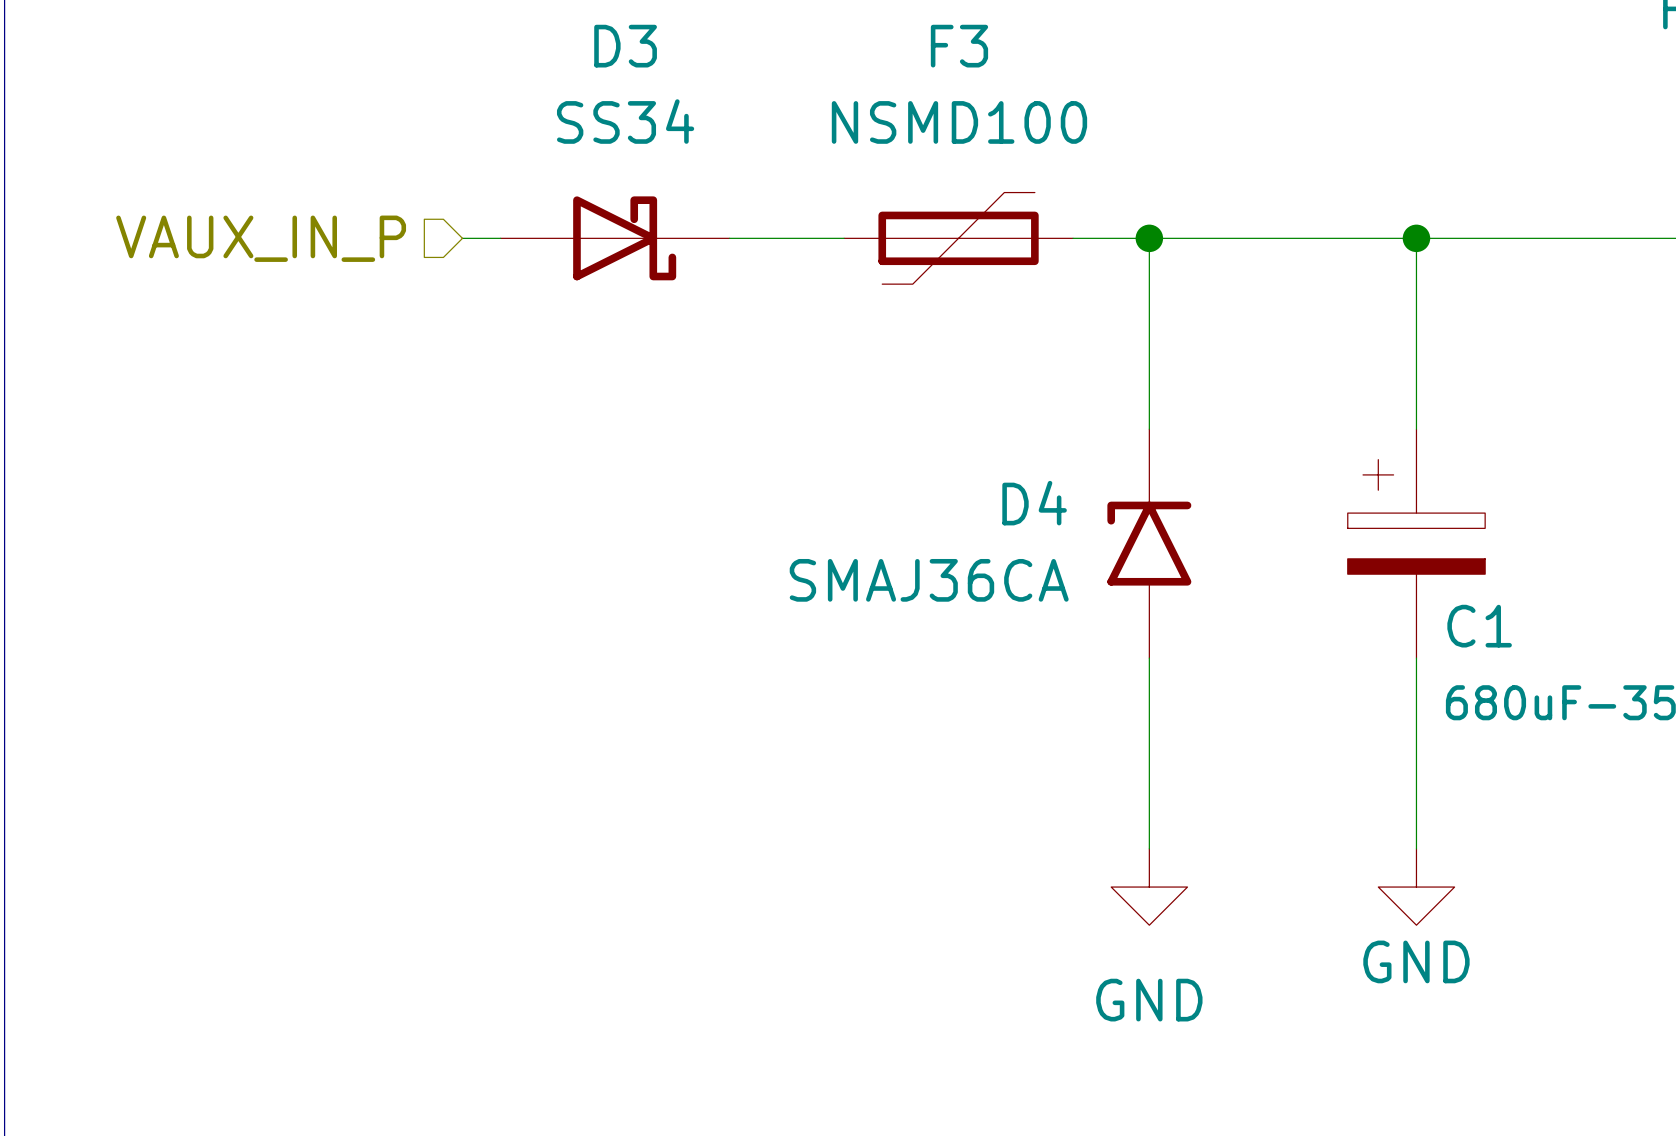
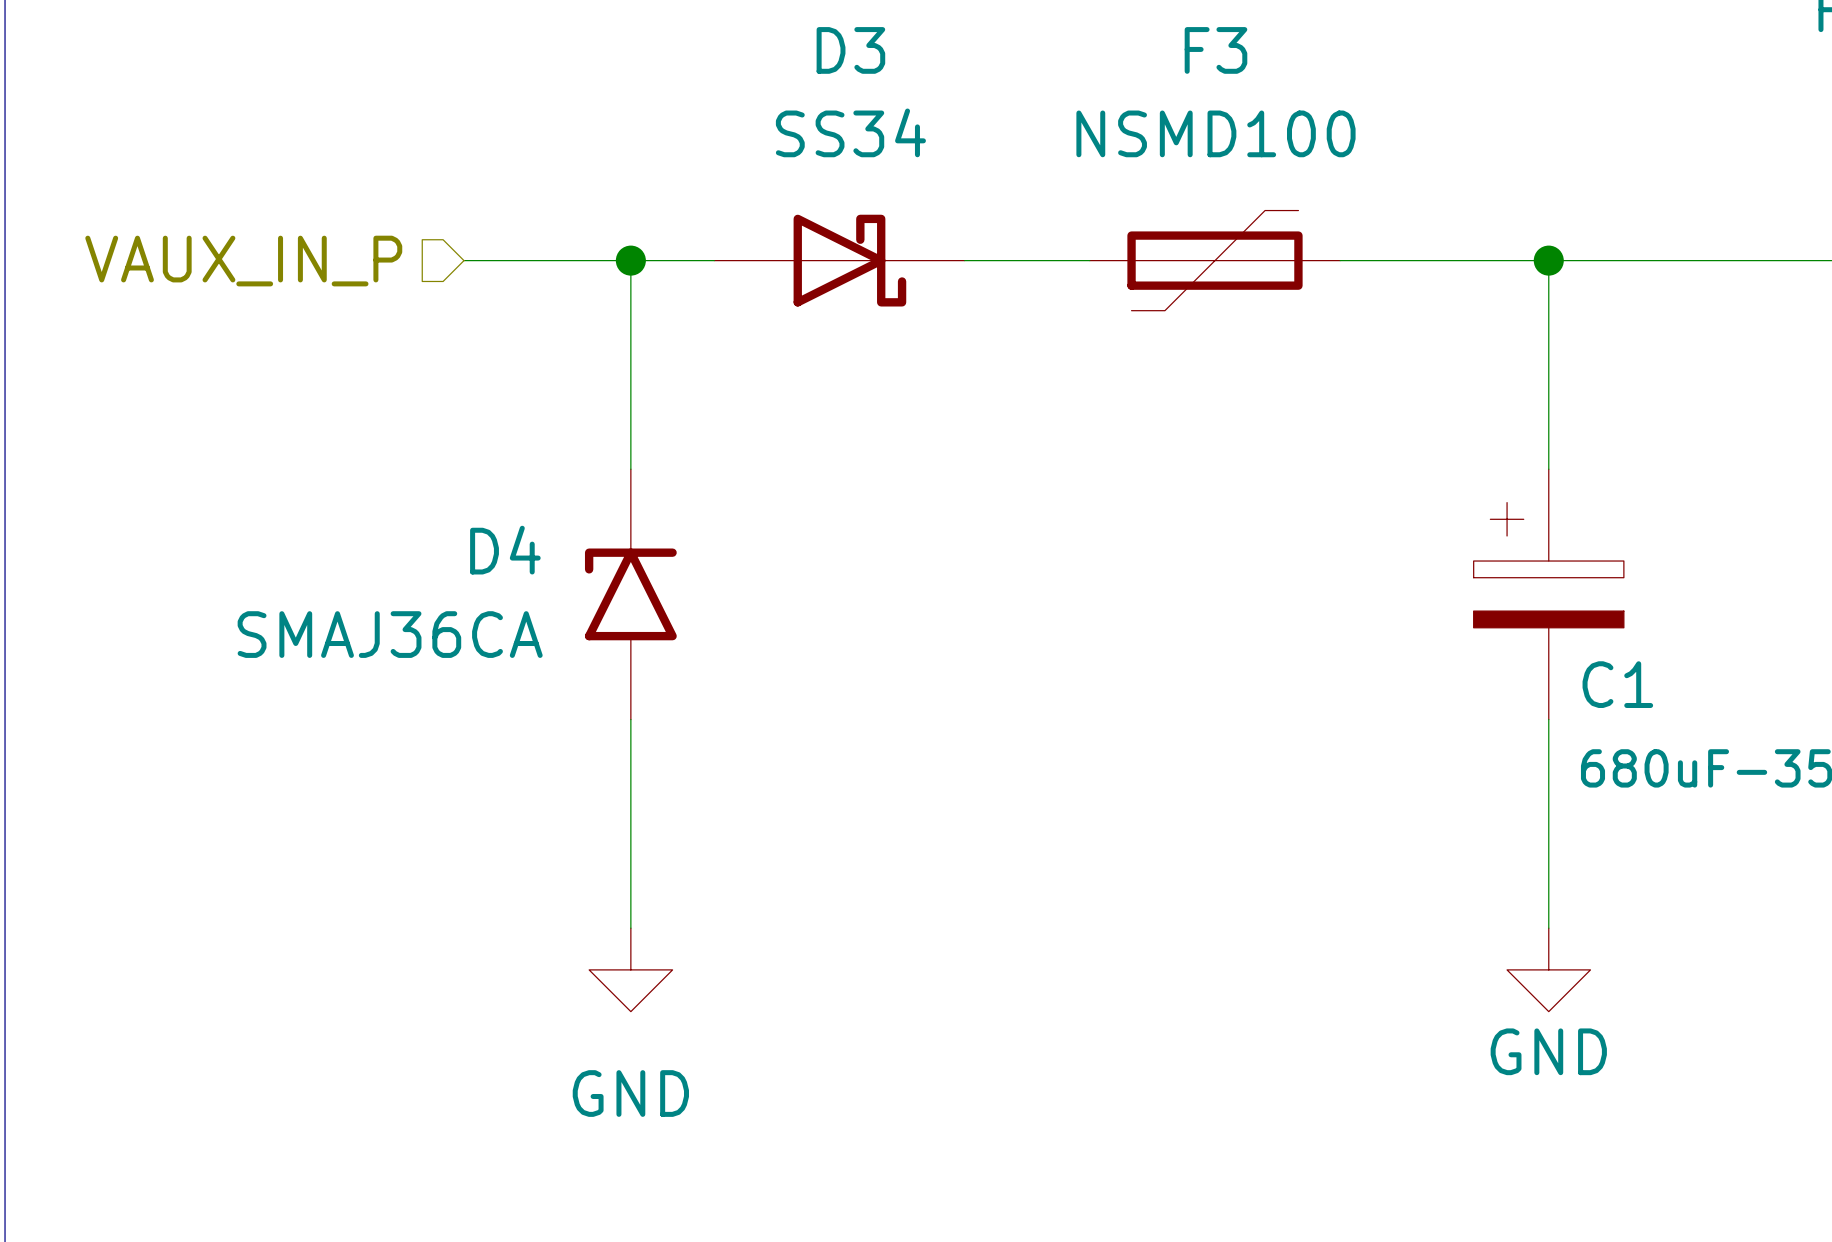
hierarchical label position: VAUX_IN_P (261, 238) -> VAUX_IN_P (243, 261)
wire: none -> (463, 260) (505, 260)
junction: none -> (630, 260)
D3 position: (615, 238) -> (839, 260)
F3 position: (958, 238) -> (1214, 260)
wire: (1149, 238) (1149, 429) -> (630, 260) (630, 469)
junction: (1149, 238) -> none
D4 position: (1149, 543) -> (630, 594)
wire: (1149, 658) (1149, 848) -> (630, 719) (630, 928)
power symbol position: GND (1149, 887) -> GND (630, 969)

